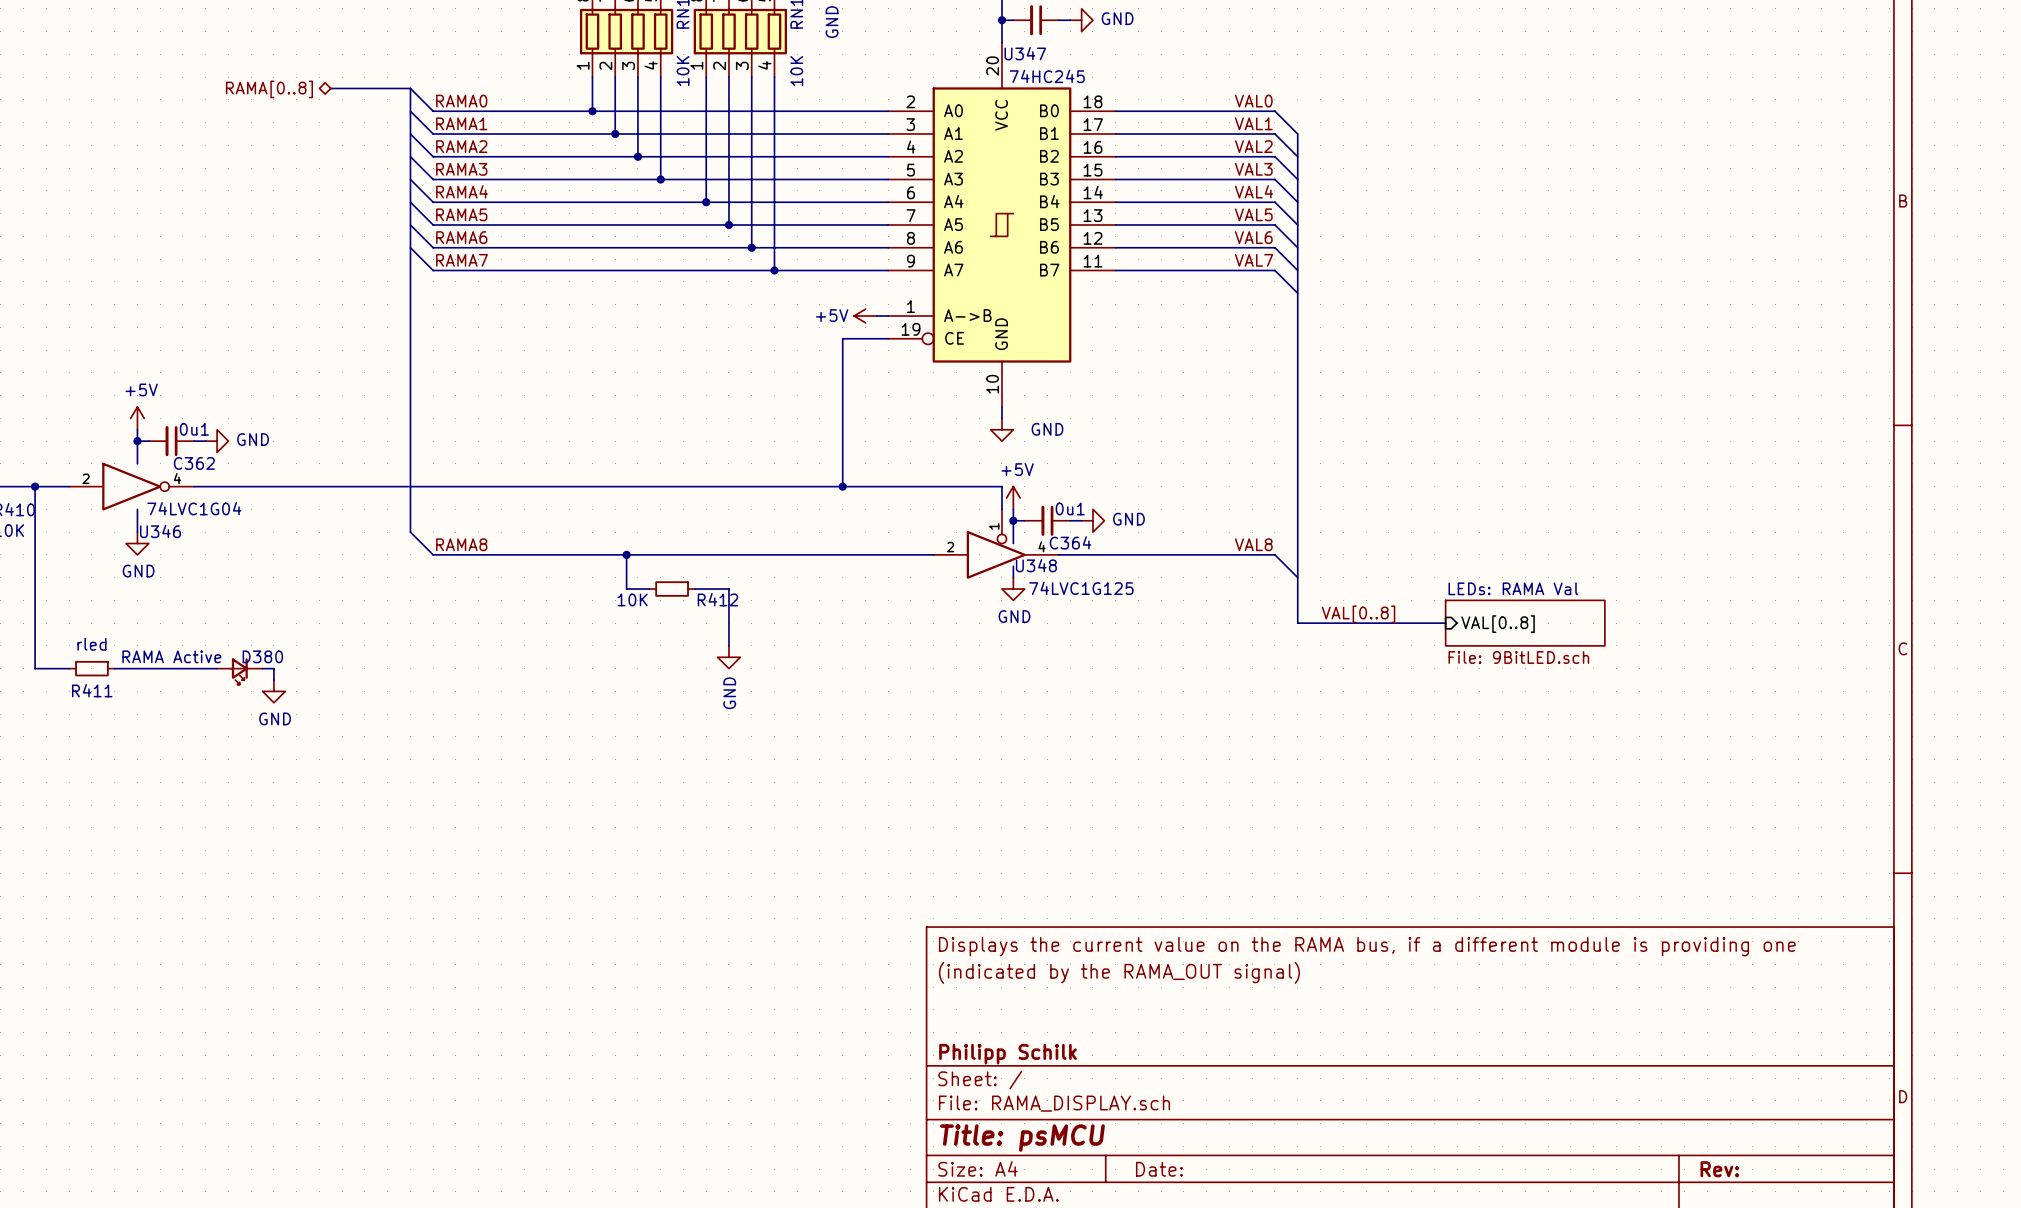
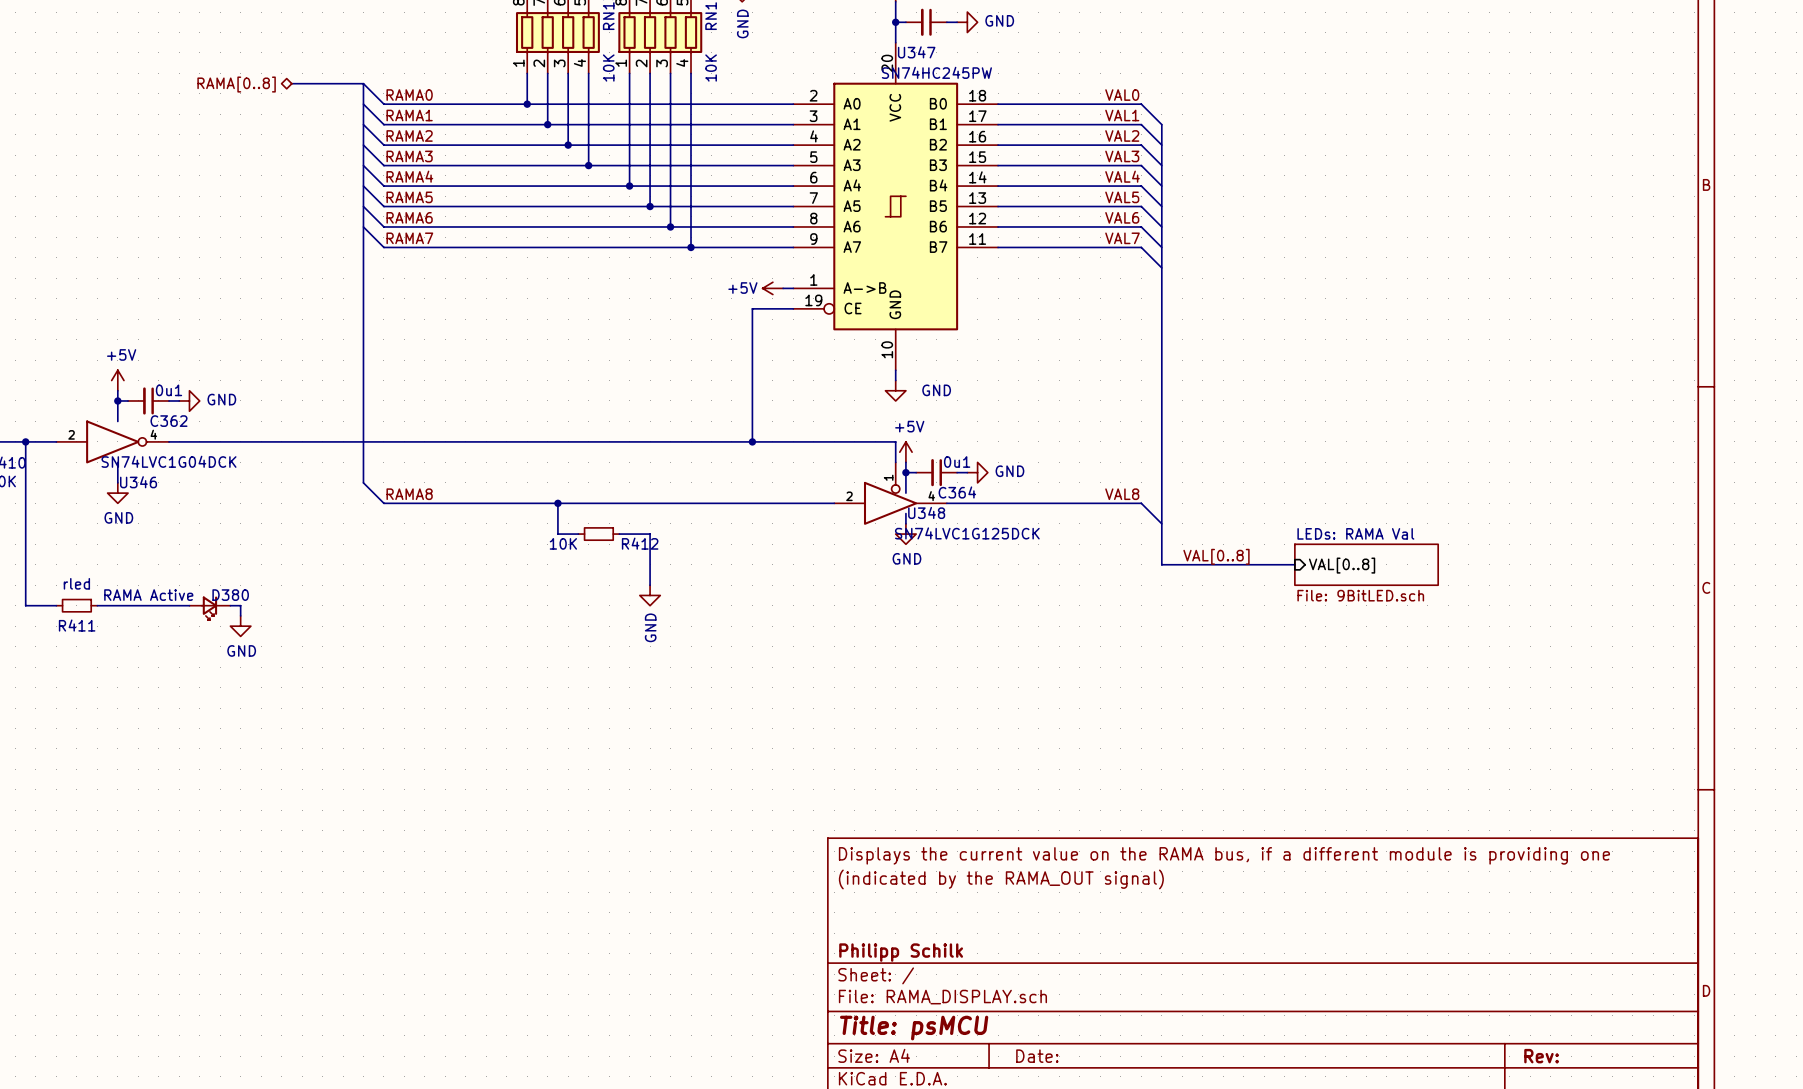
U347 value: 74HC245 (1047, 76) -> SN74HC245PW (936, 72)
U346 value: 74LVC1G04 (194, 508) -> SN74LVC1G04DCK (169, 461)
U348 value: 74LVC1G125 (1081, 588) -> SN74LVC1G125DCK (967, 533)

